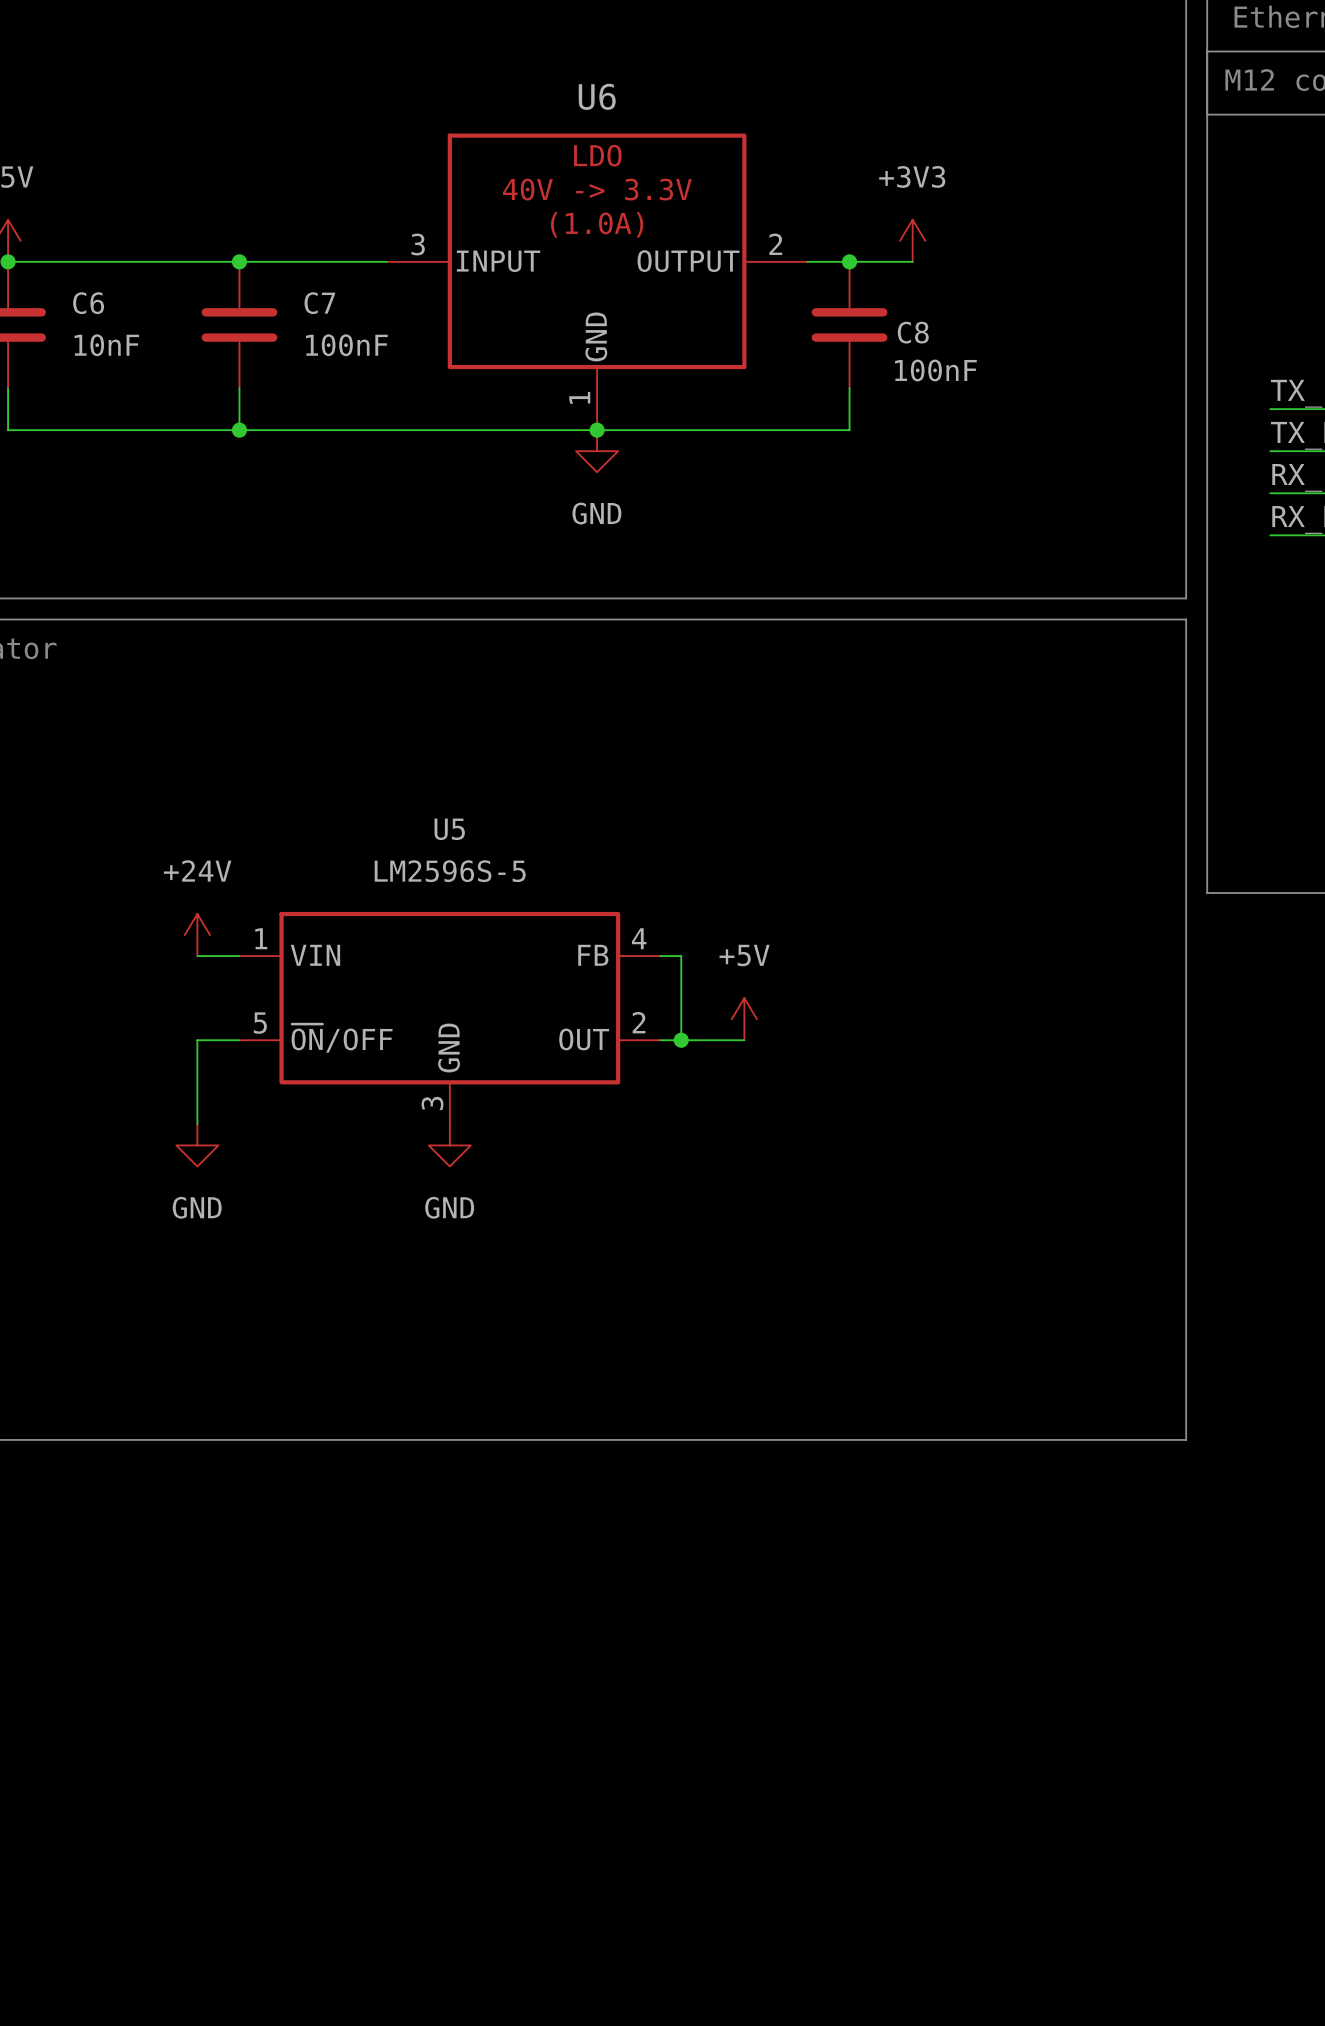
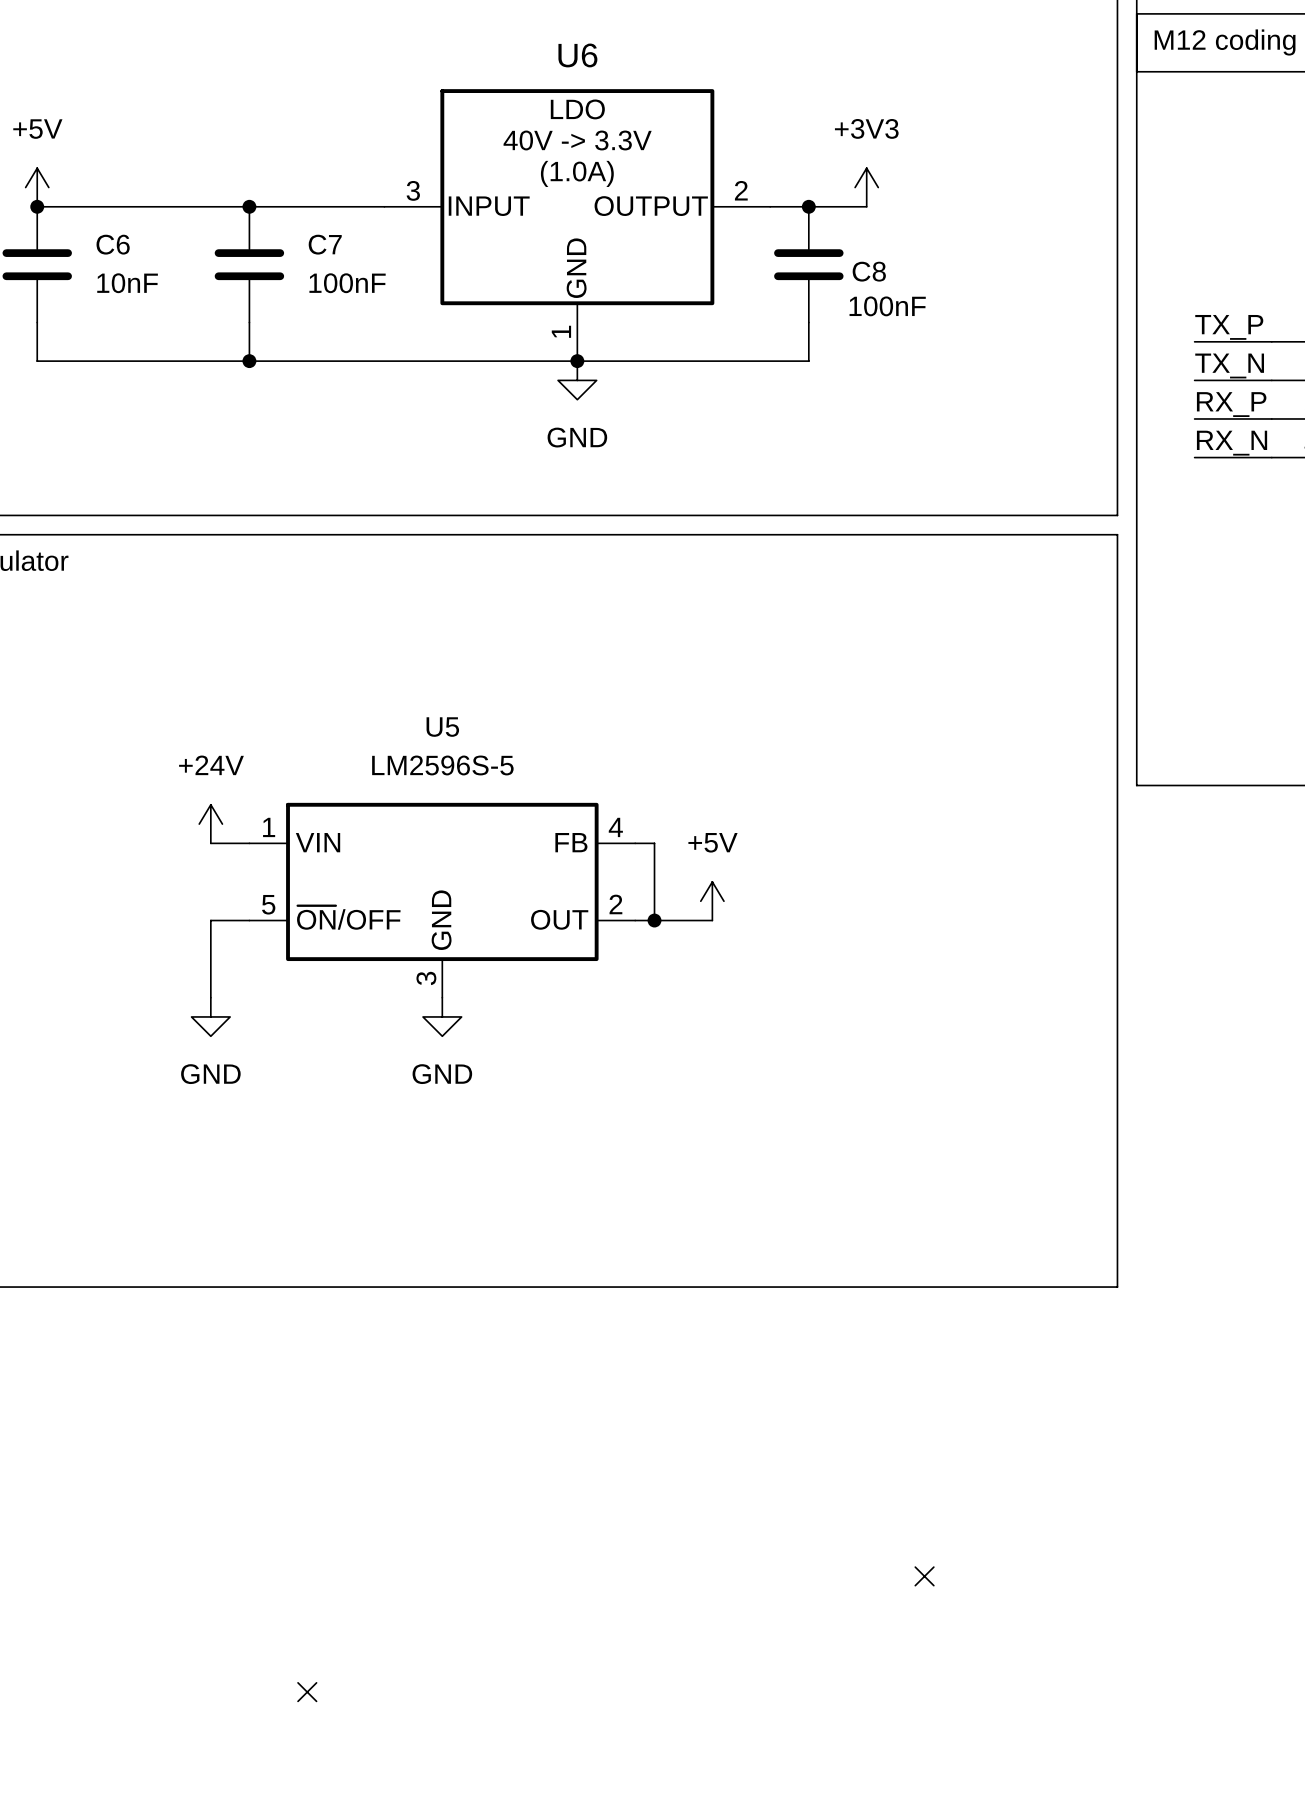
no-connect mark: none -> (924, 1576)
no-connect mark: none -> (307, 1692)

